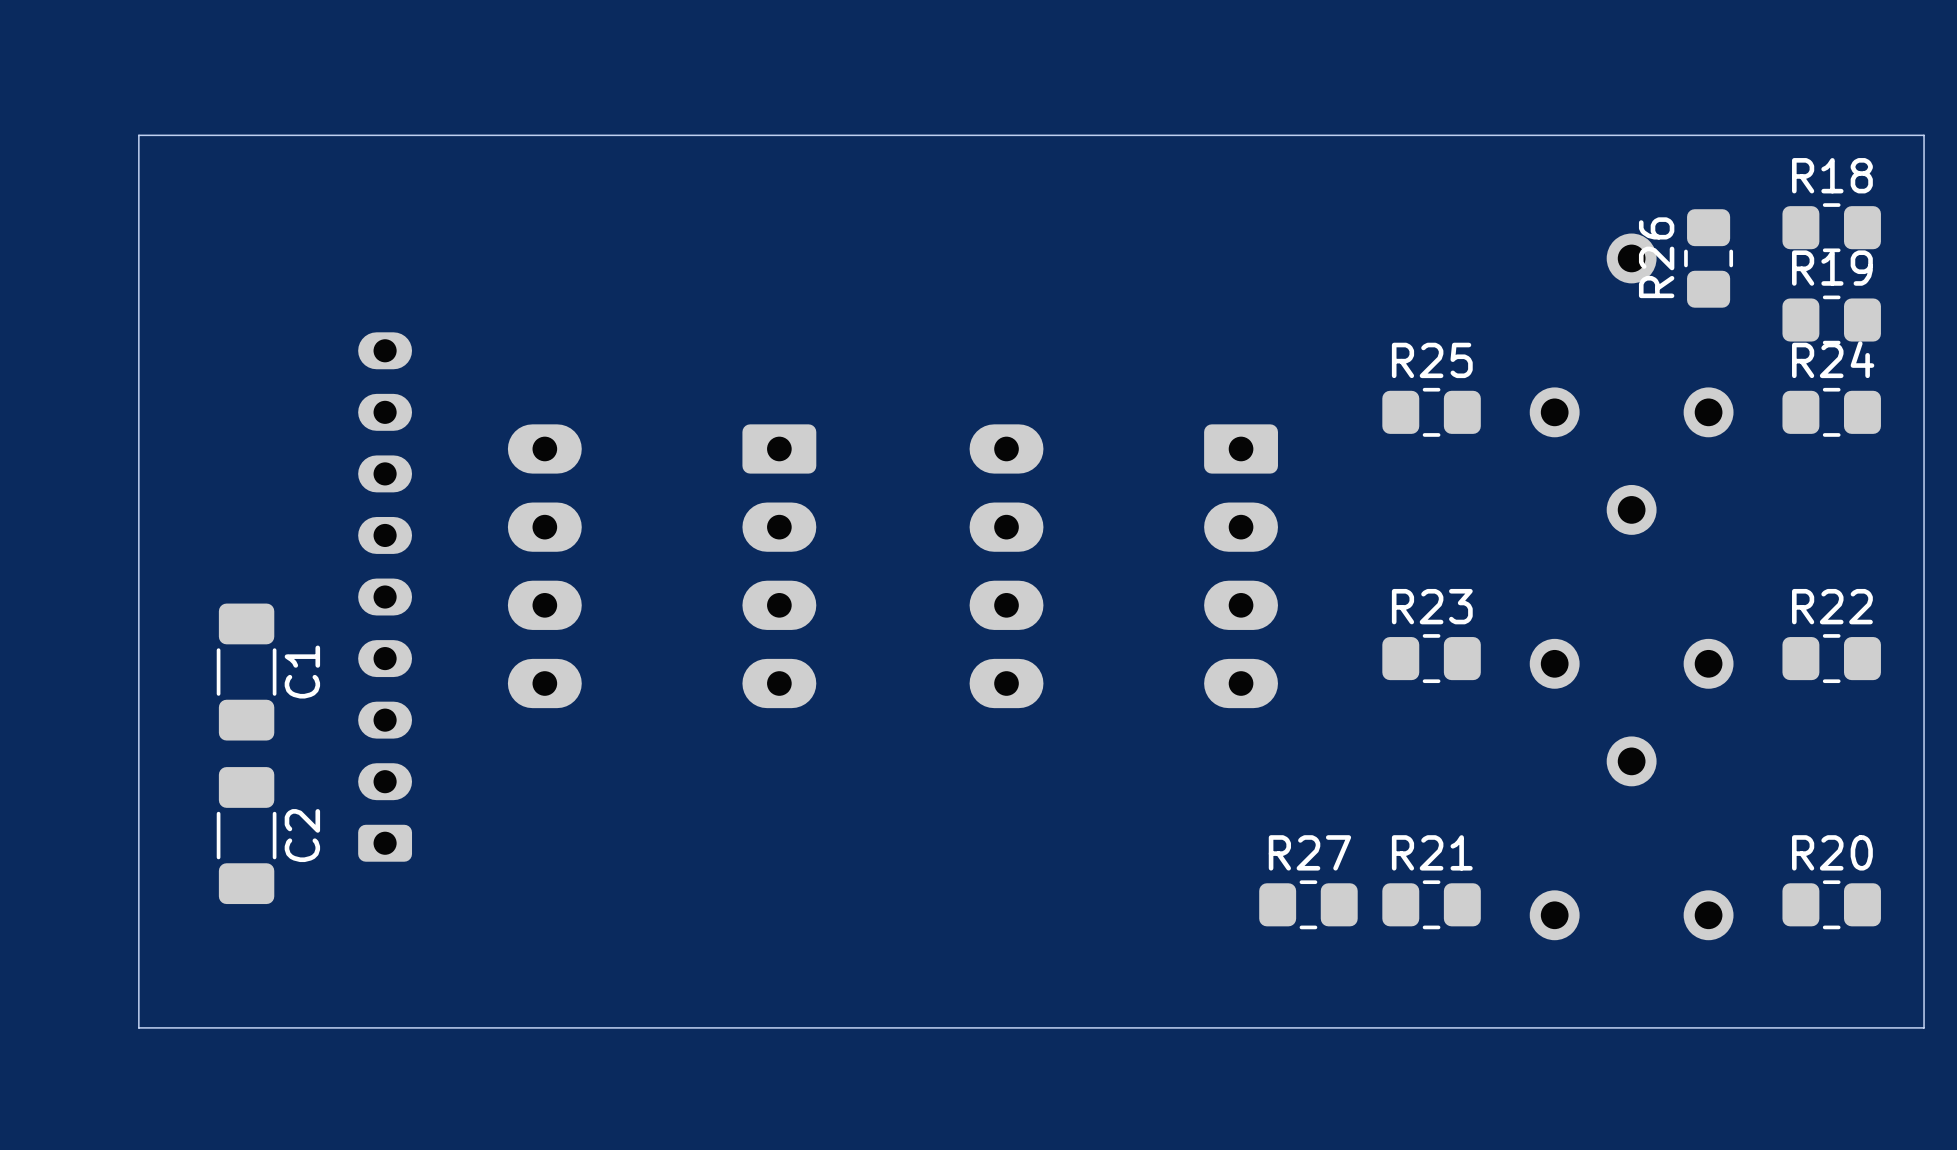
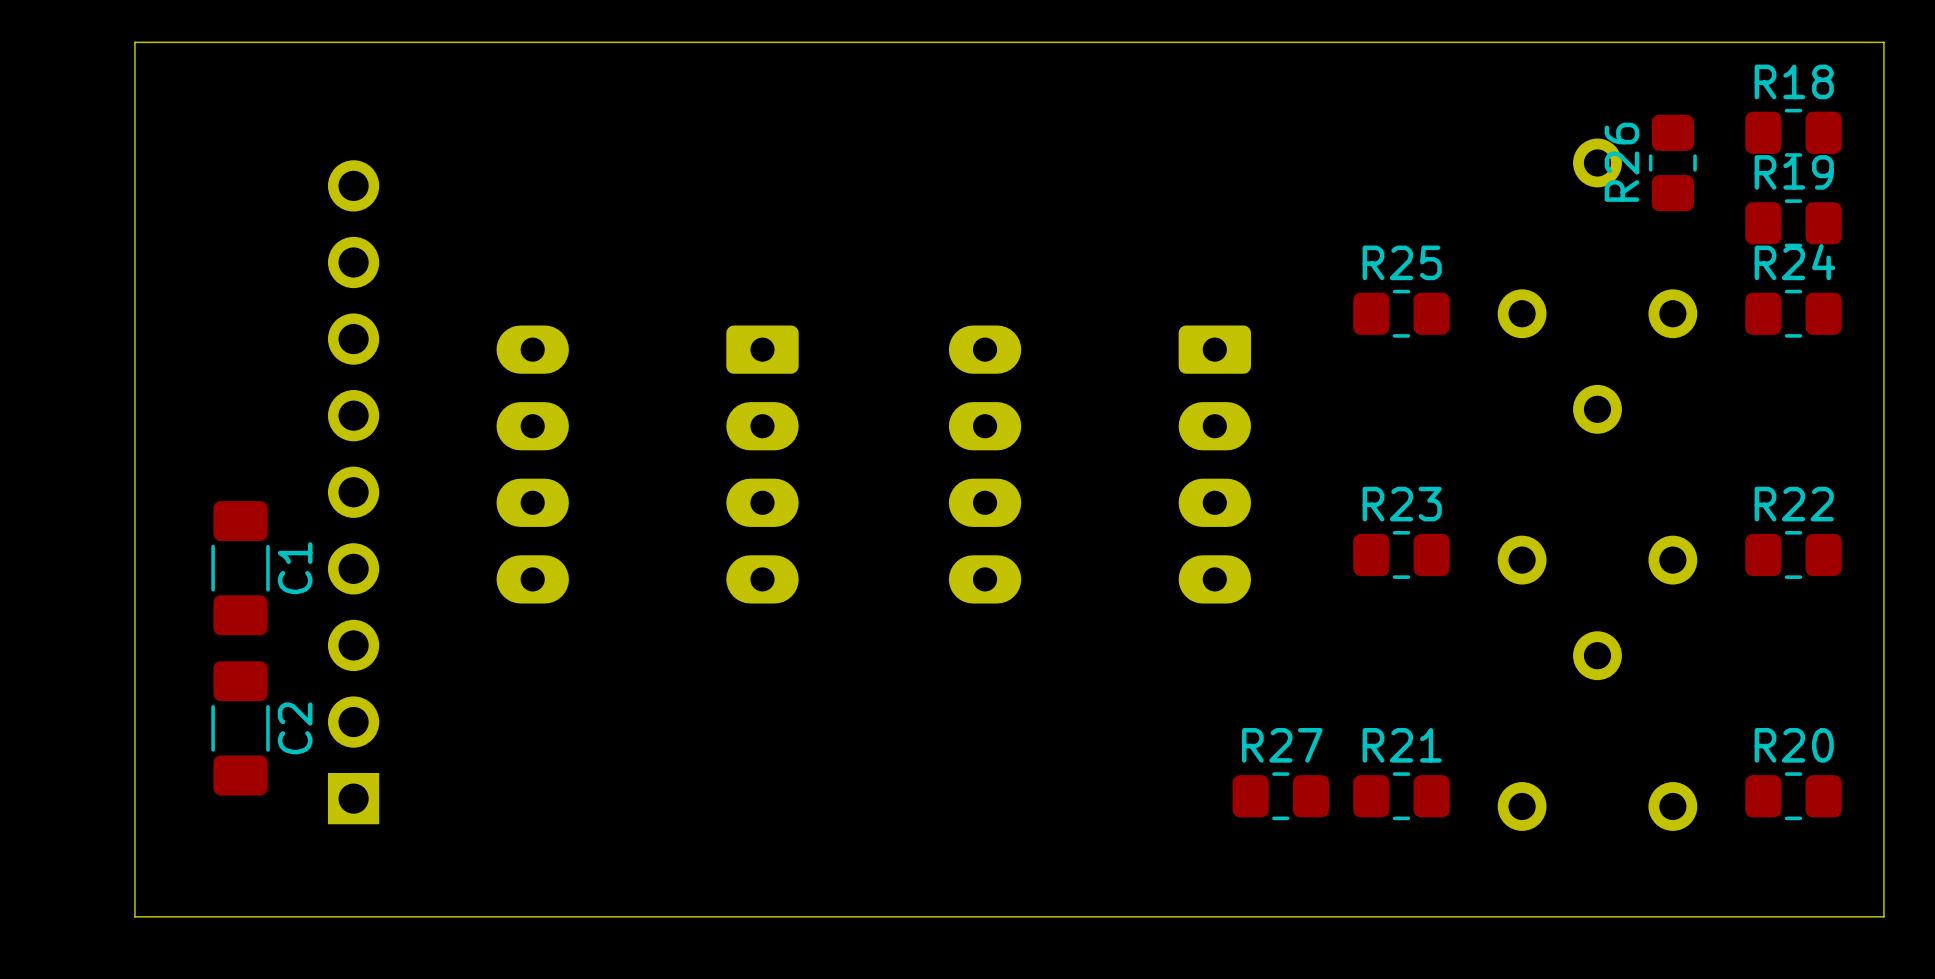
part footprint: [358, 332, 413, 862] -> [327, 160, 380, 825]

